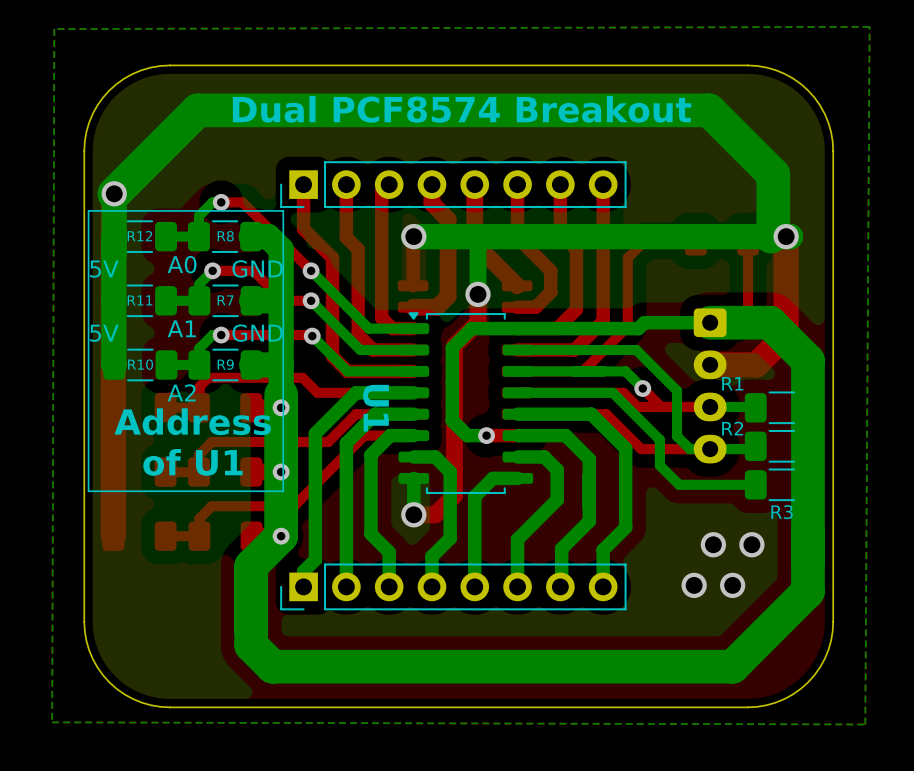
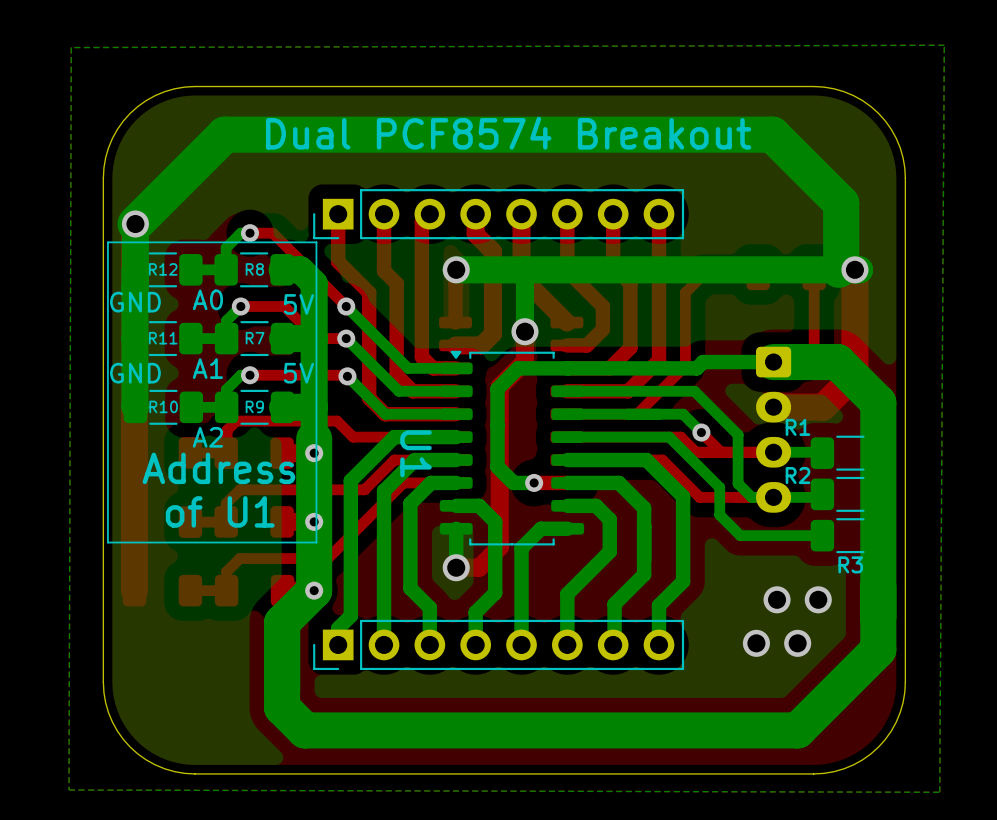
text: GND (257, 268) -> 5V (298, 304)
text: 5V (104, 269) -> GND (135, 302)
text: 5V (104, 333) -> GND (135, 373)
text: GND (257, 333) -> 5V (298, 373)

